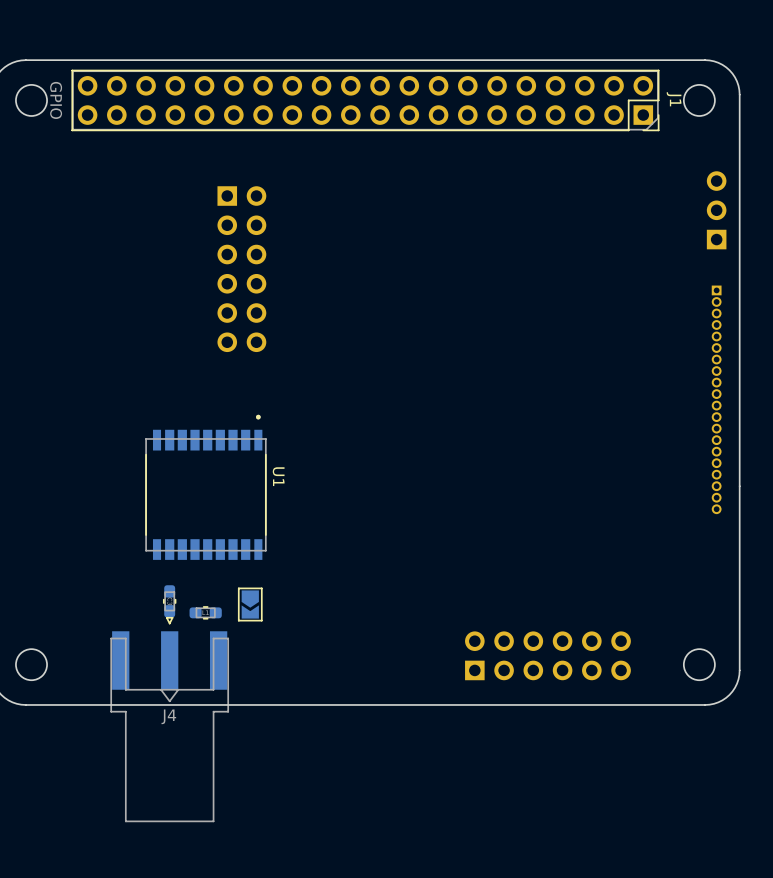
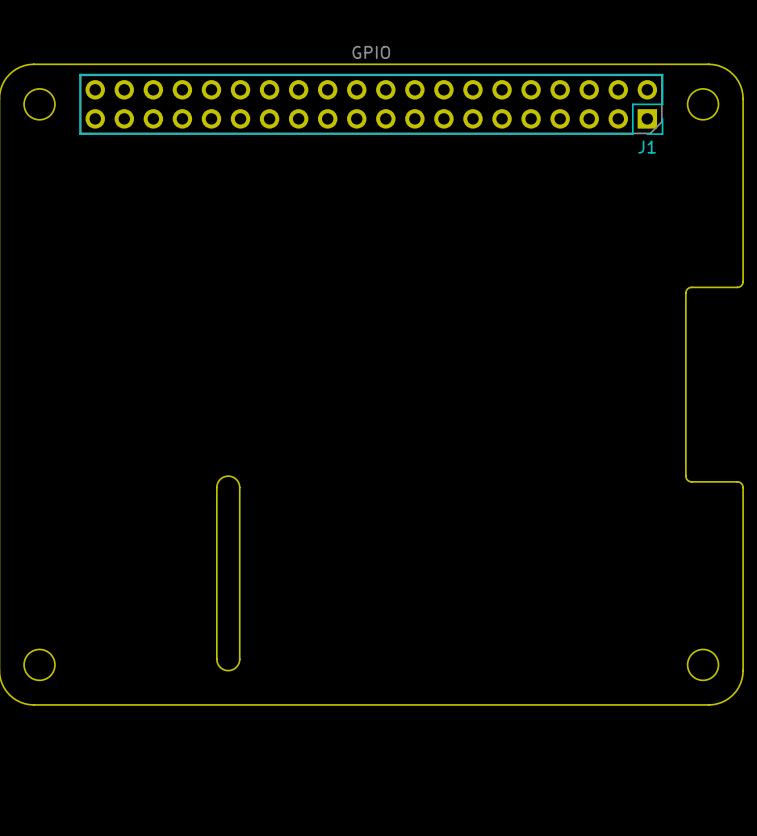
J1 name rotation: 0° (674, 99) -> 90° counterclockwise (647, 147)
J1 name position: J1 (674, 99) -> J1 (647, 147)
J1 value rotation: 0° (56, 100) -> 90° counterclockwise (371, 52)
J1 value position: GPIO (56, 100) -> GPIO (371, 52)
part: (716, 210) -> none
part: (241, 269) -> none
board edge: (739, 278) (739, 486) -> (743, 281) (738, 287) (690, 287) (685, 293) (686, 477) (690, 481) (738, 481) (743, 487)
part: (716, 399) -> none
board edge: none -> (239, 487) (239, 660) (235, 668) (226, 670) (219, 666) (216, 659) (216, 486) (220, 479) (228, 476) (236, 479) (239, 487)
U1: (205, 487) -> none
part: (169, 601) -> none
part: (250, 604) -> none
part: (205, 612) -> none
part: (547, 655) -> none
J4: (169, 719) -> none

